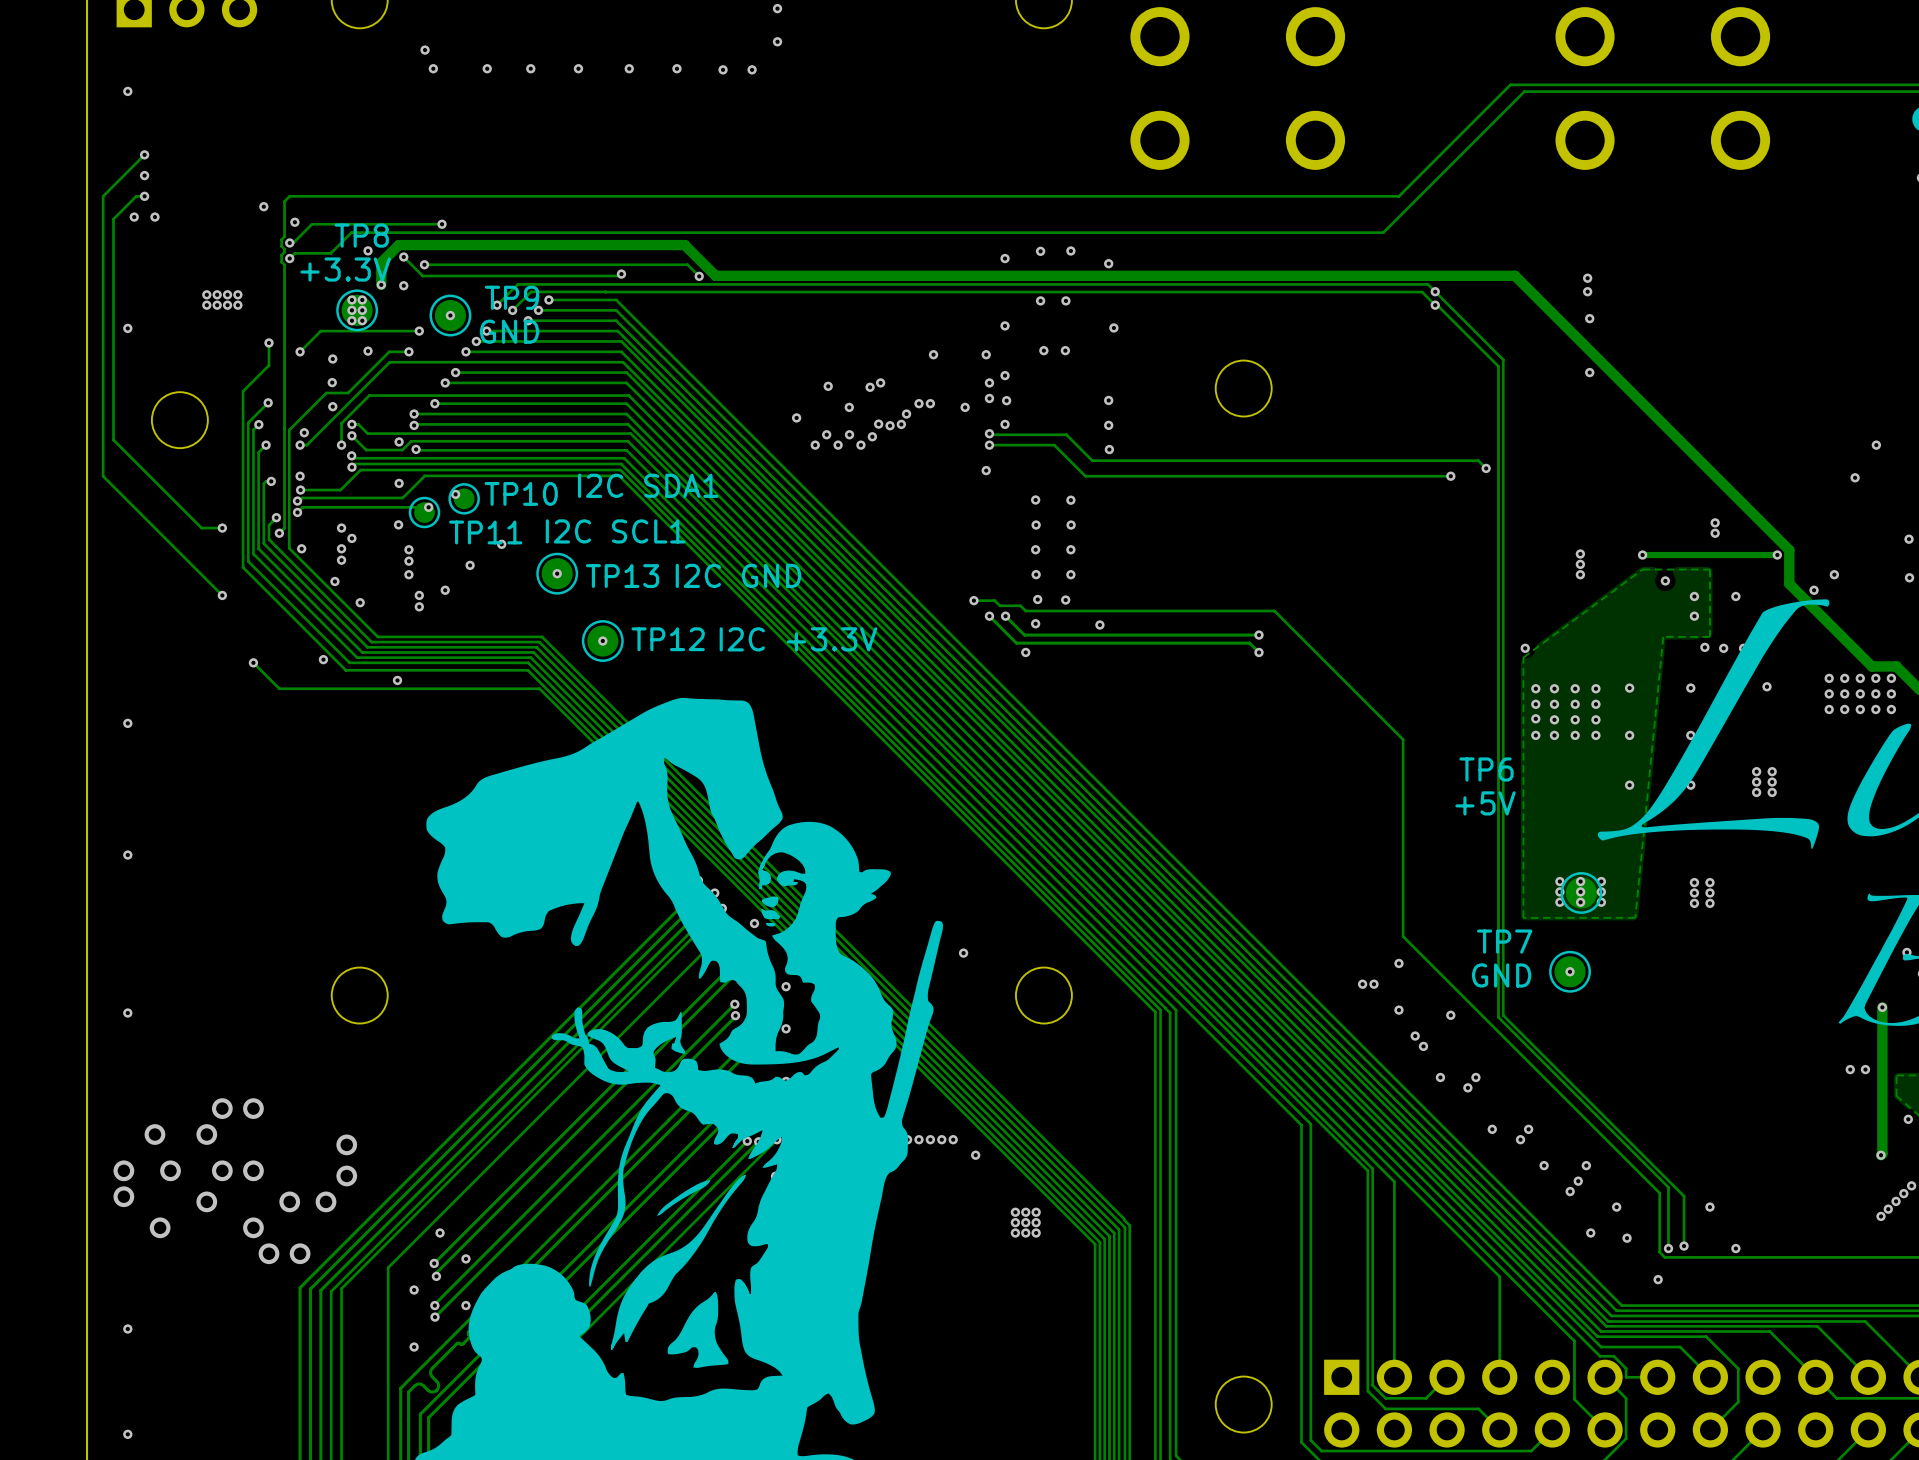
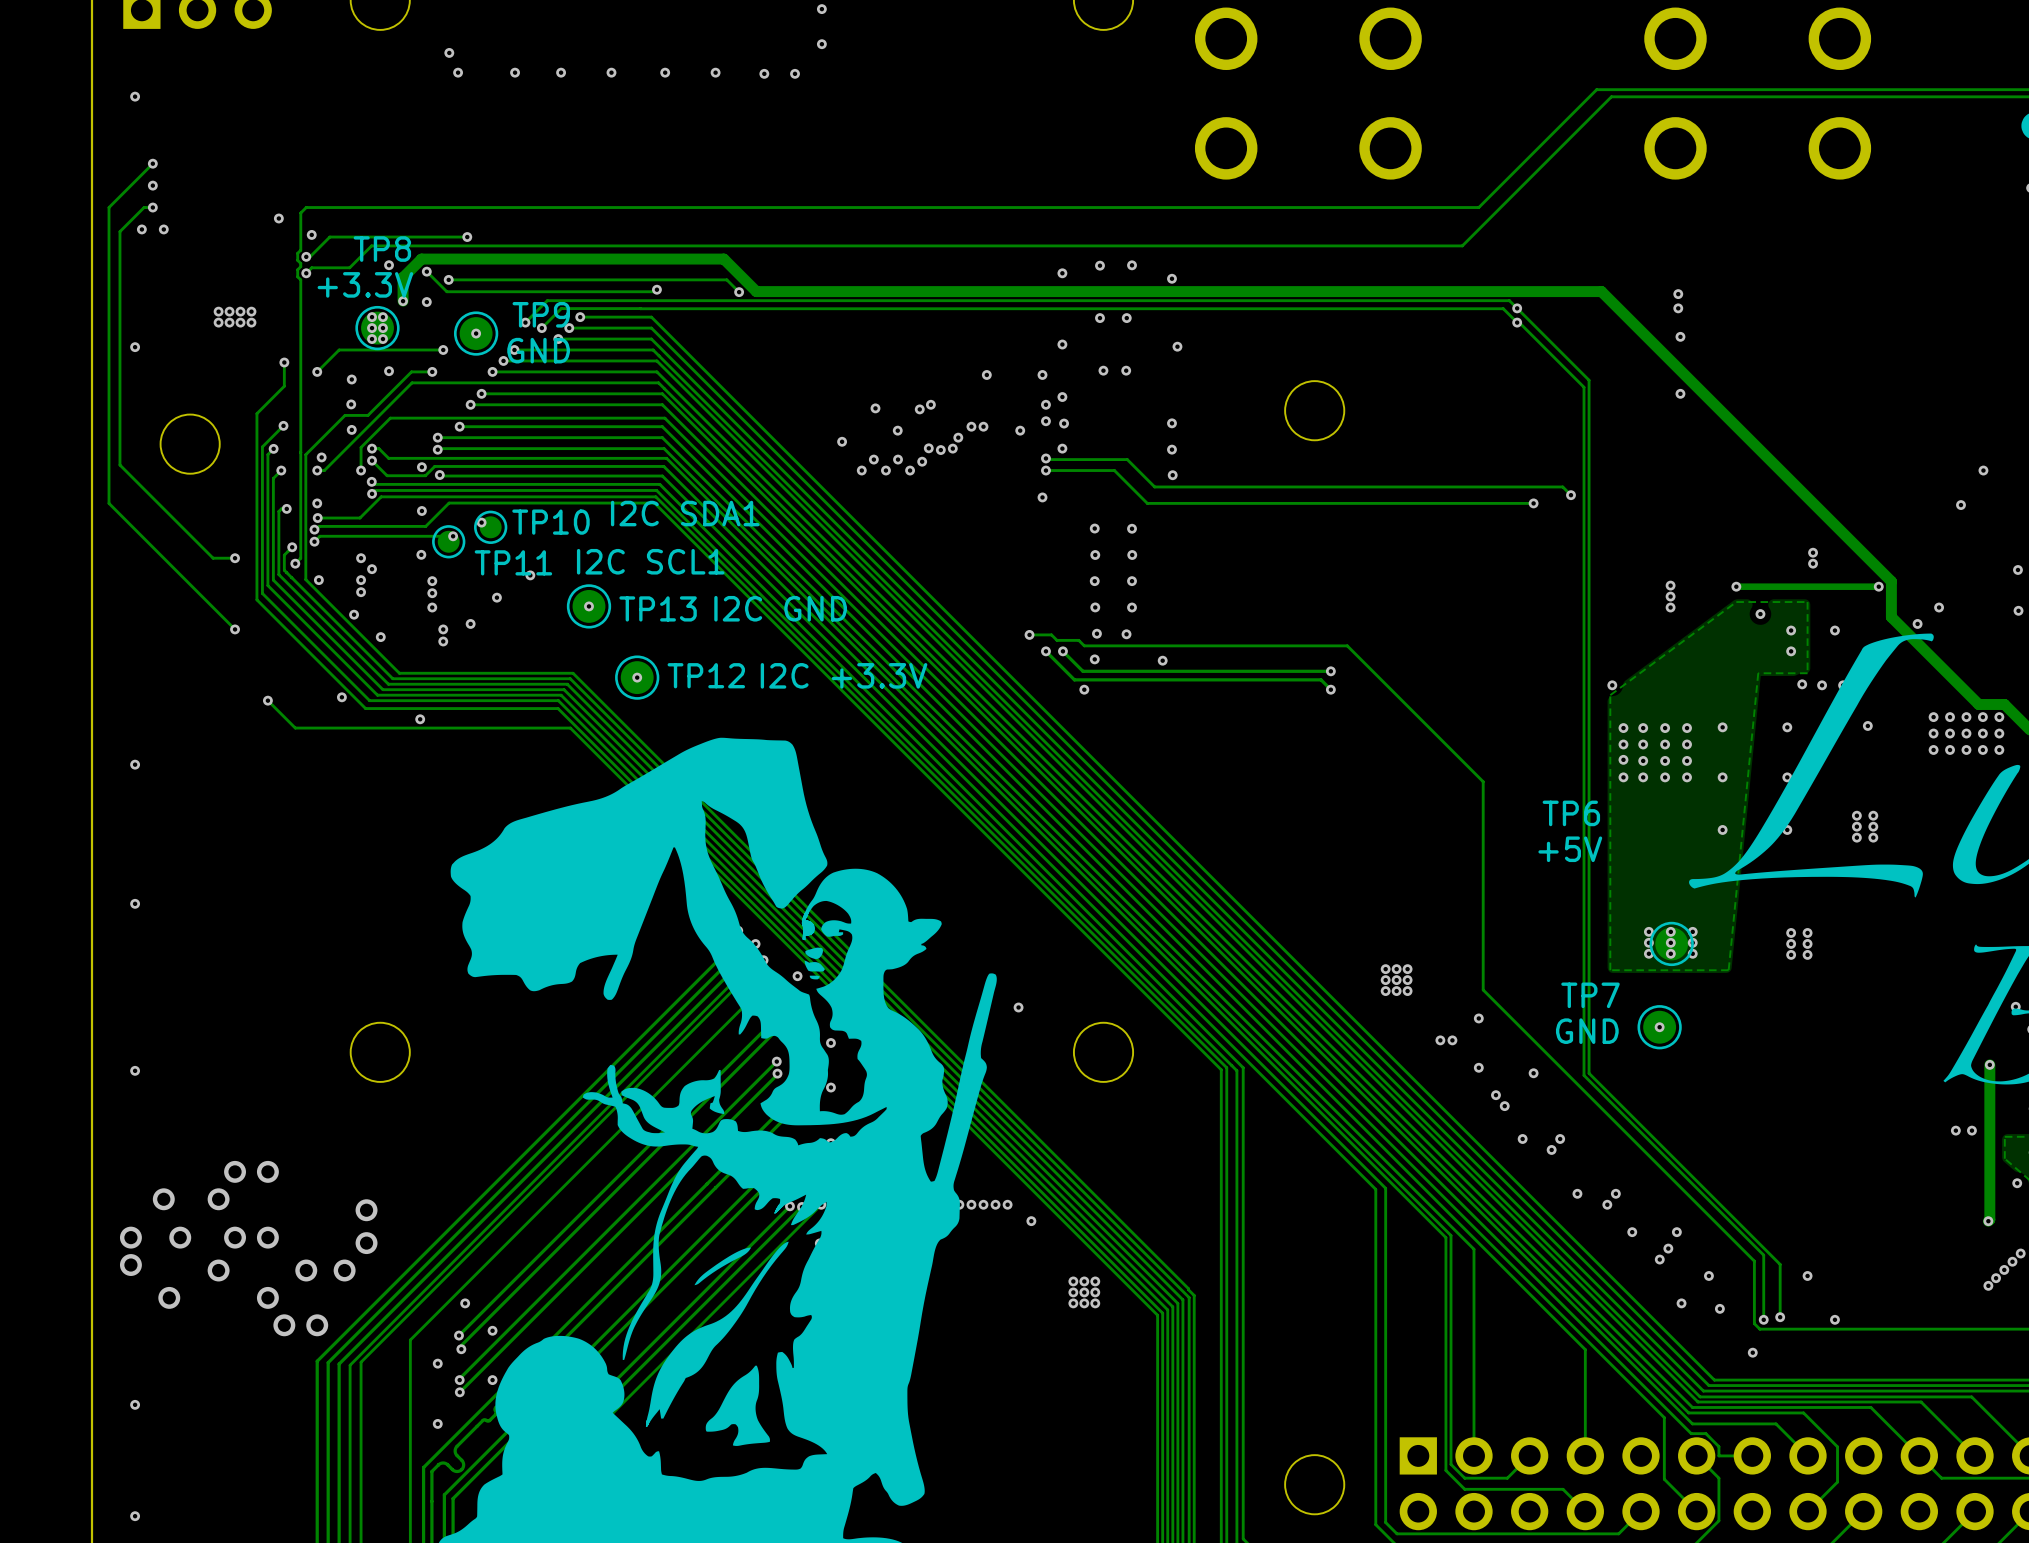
via: none -> (1385, 969)
via: none -> (1396, 969)
via: none -> (1407, 969)
via: none -> (1385, 980)
via: none -> (1396, 980)
via: none -> (1407, 980)
via: none -> (1385, 991)
via: none -> (1396, 991)
via: none -> (1407, 991)

